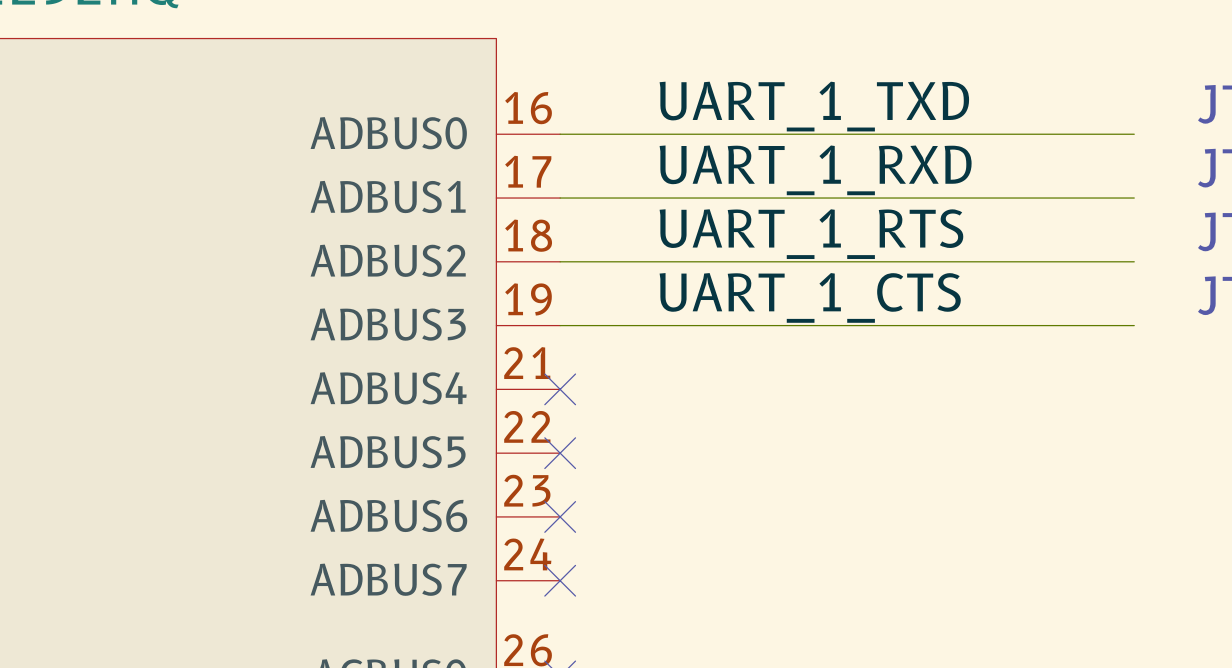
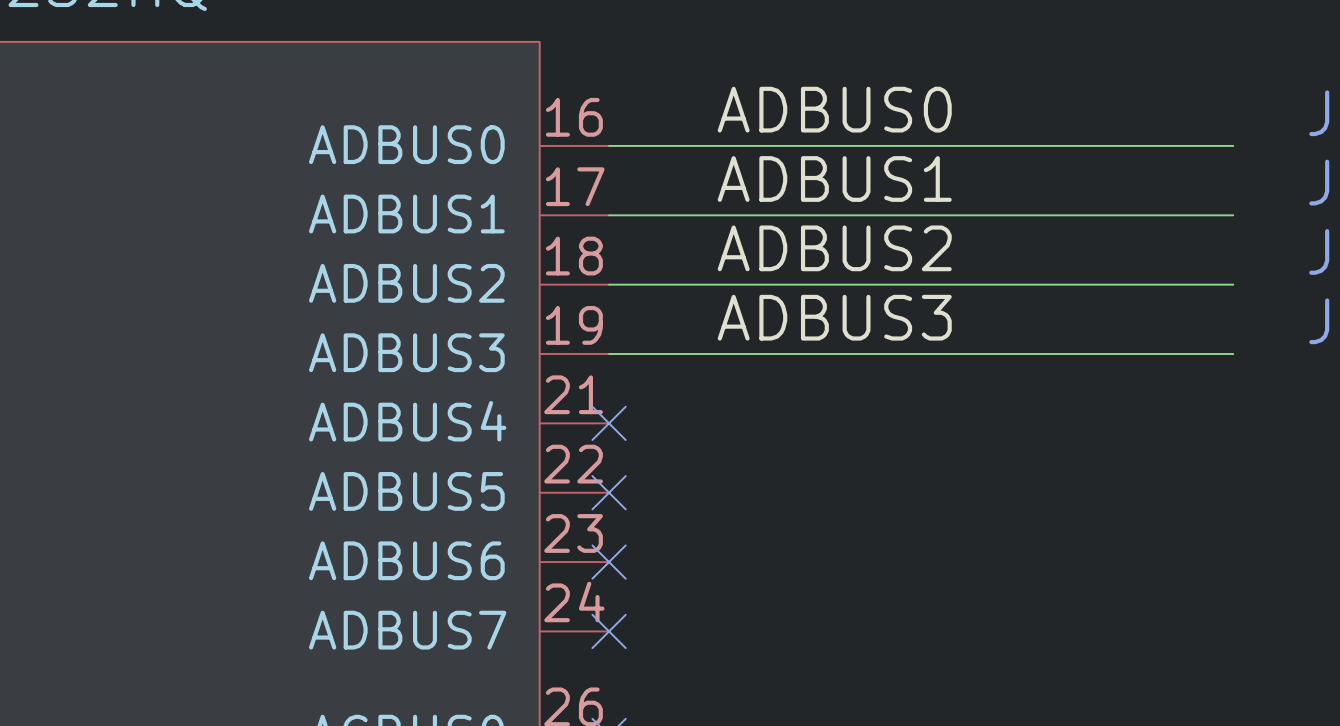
label: UART_1_TXD (814, 106) -> ADBUS0 (834, 109)
label: UART_1_RXD (815, 170) -> ADBUS1 (834, 179)
label: UART_1_RTS (811, 234) -> ADBUS2 (834, 248)
label: UART_1_CTS (810, 297) -> ADBUS3 (834, 317)

